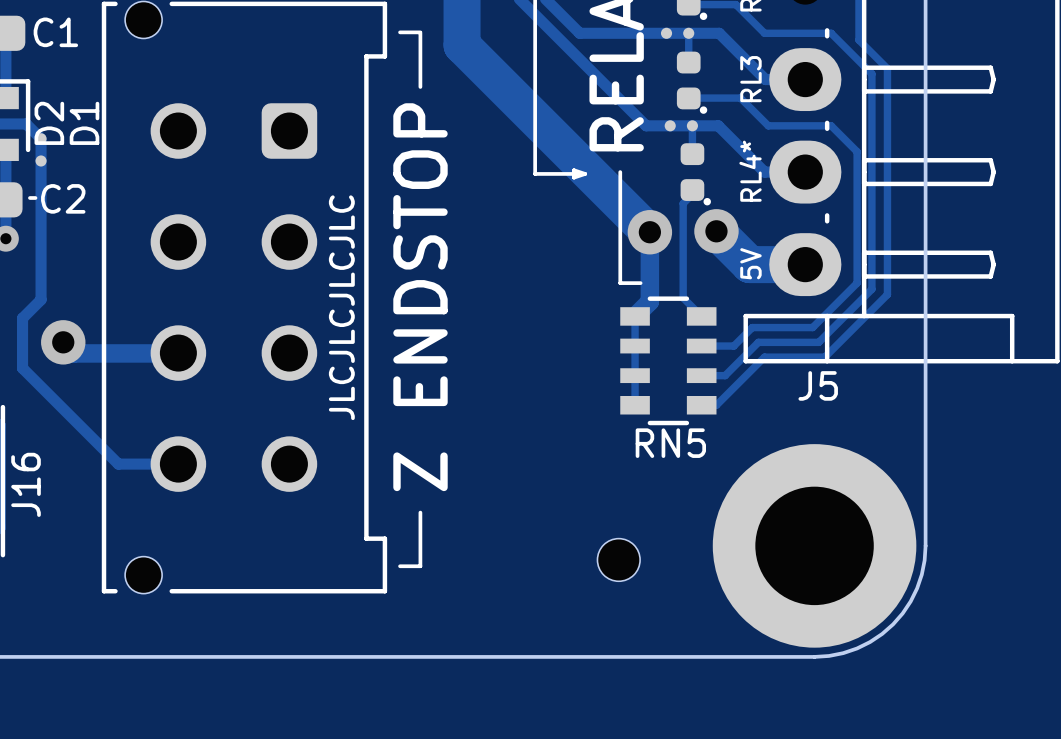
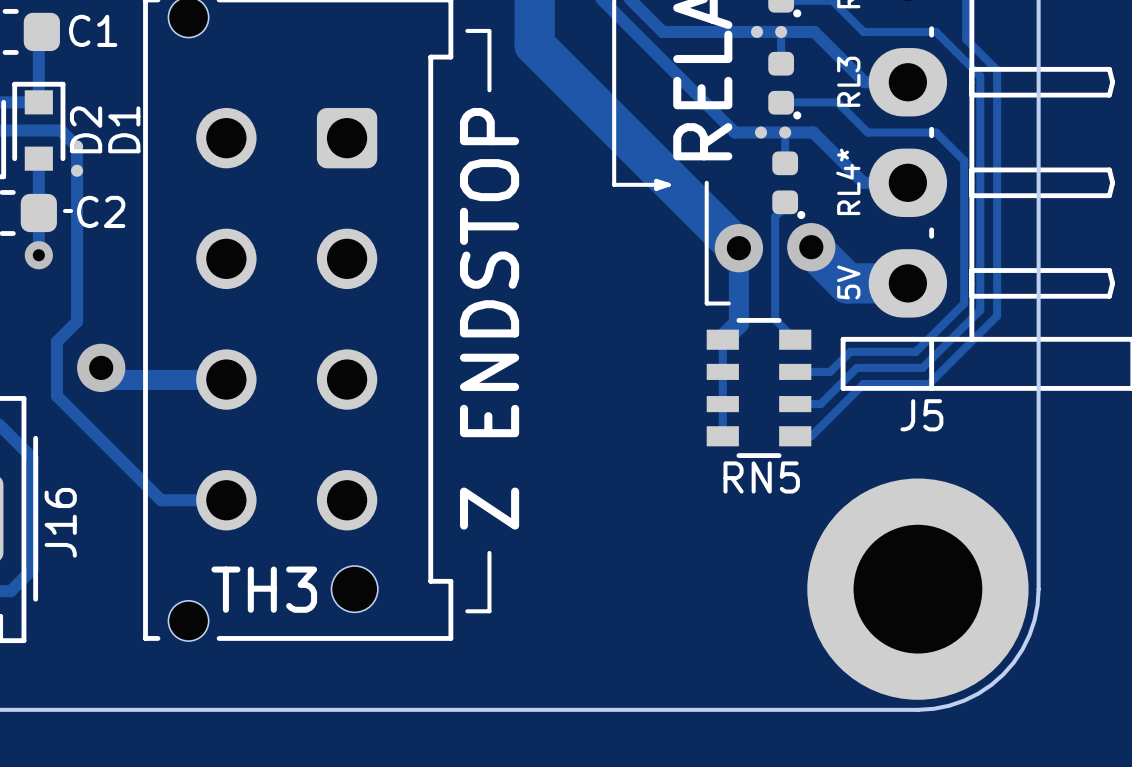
text: JLCJLCJLCJLC (341, 307) -> none
TH3: none -> (354, 589)
part: (618, 559) -> none

